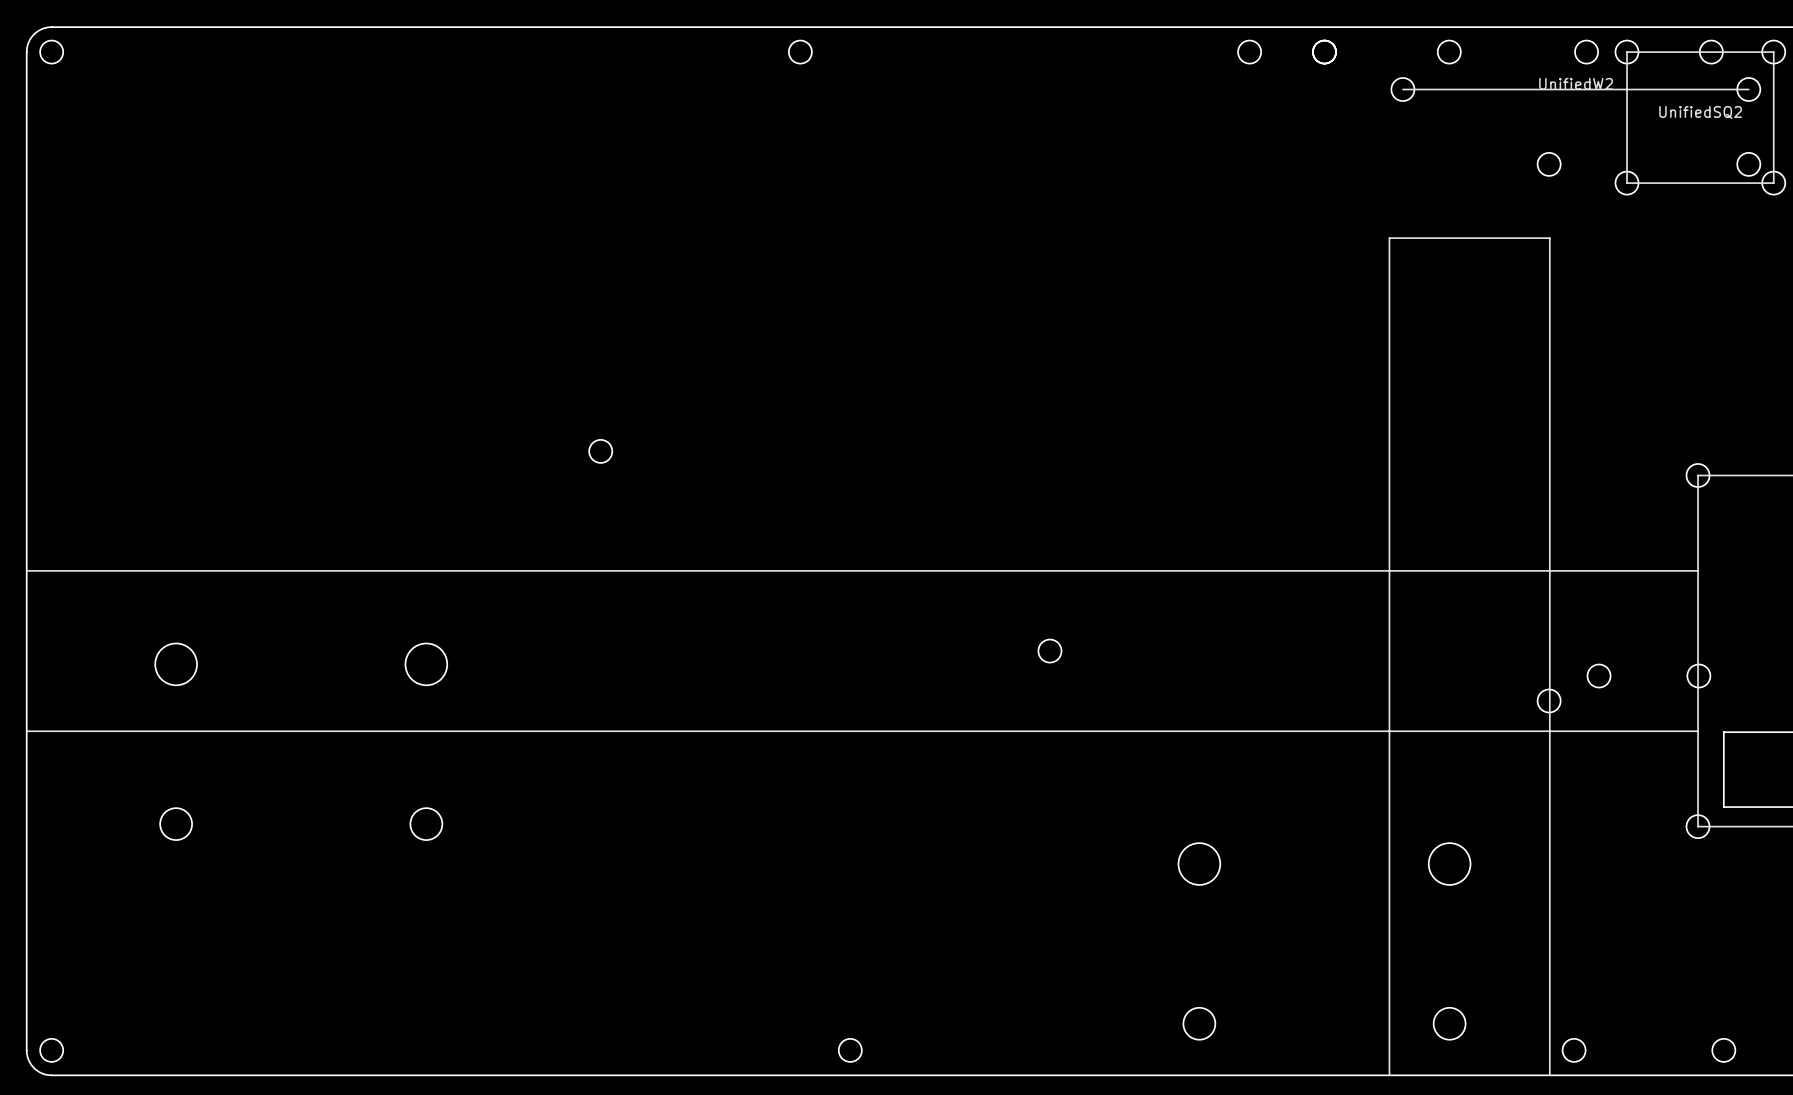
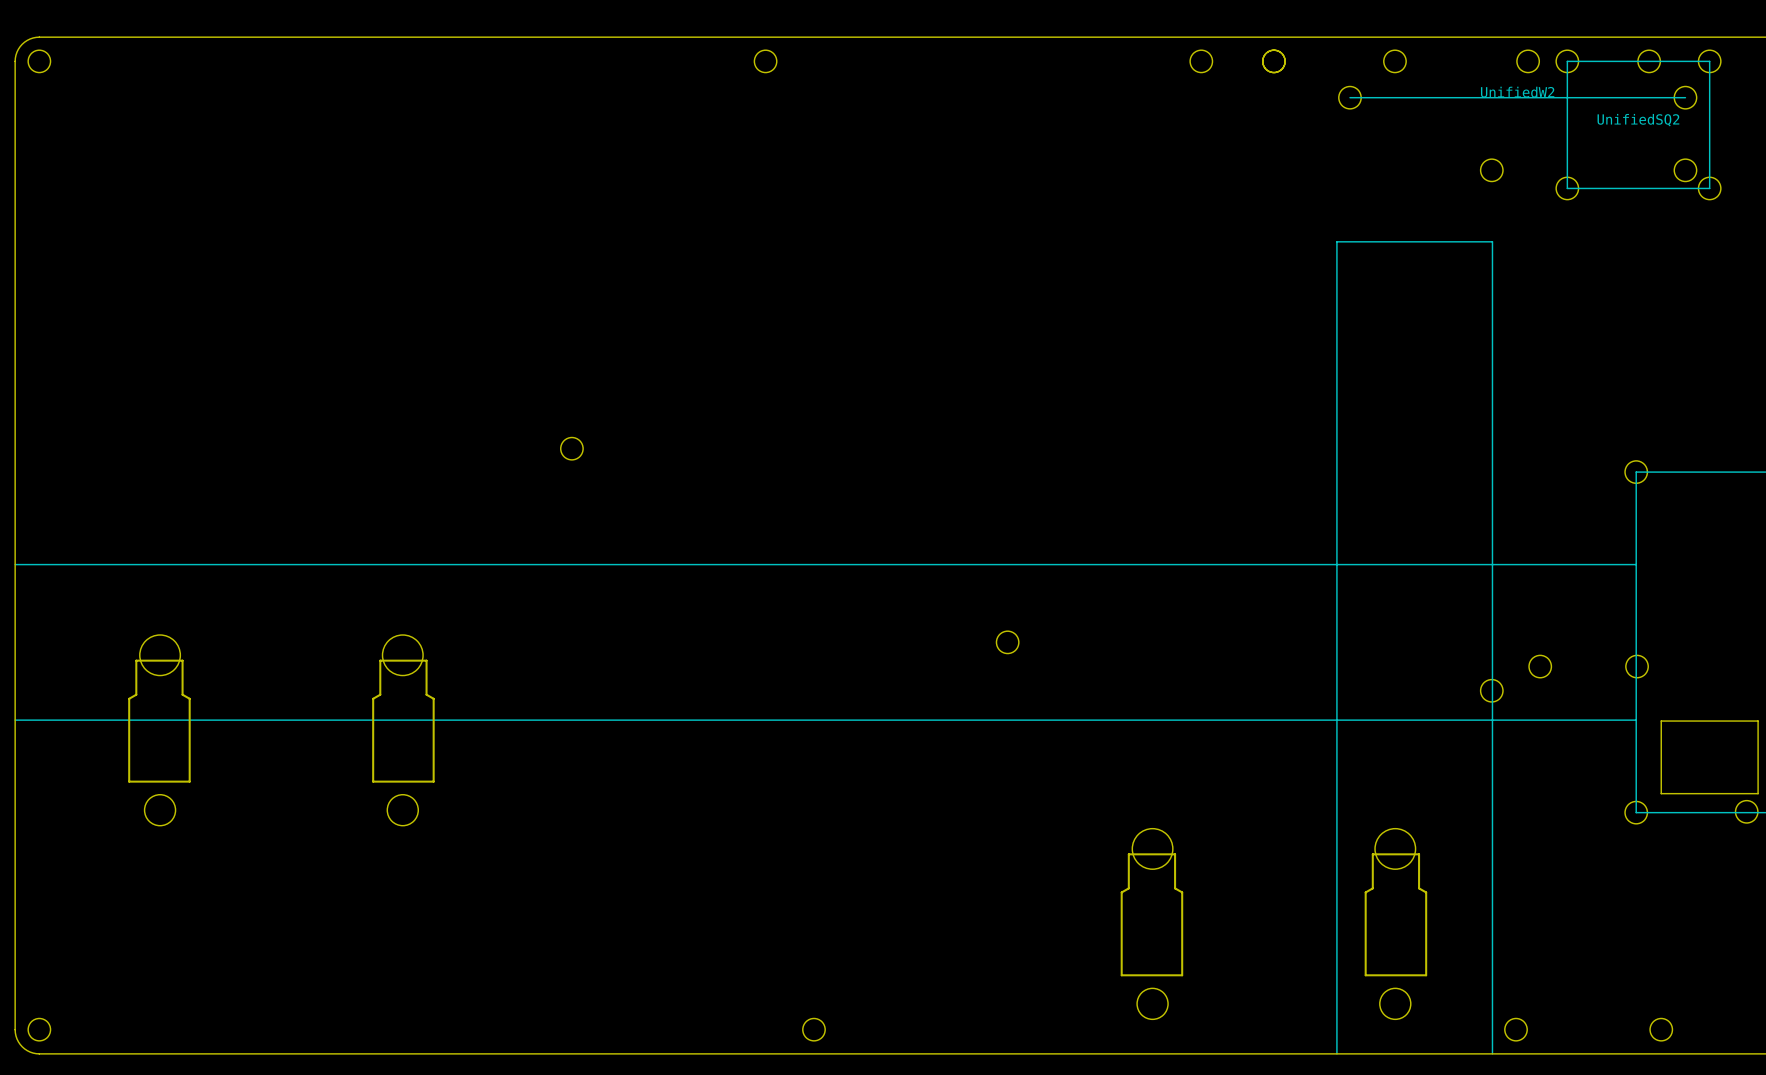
drawing: none -> [128, 659, 435, 783]
drawing: none -> [1120, 853, 1428, 977]

